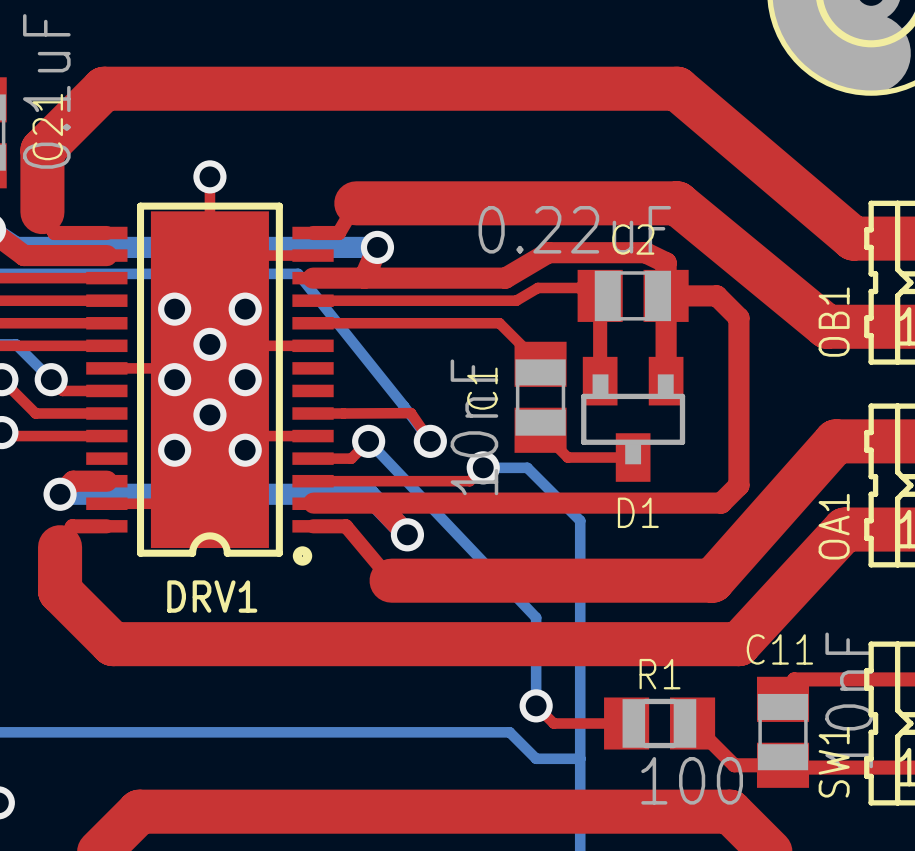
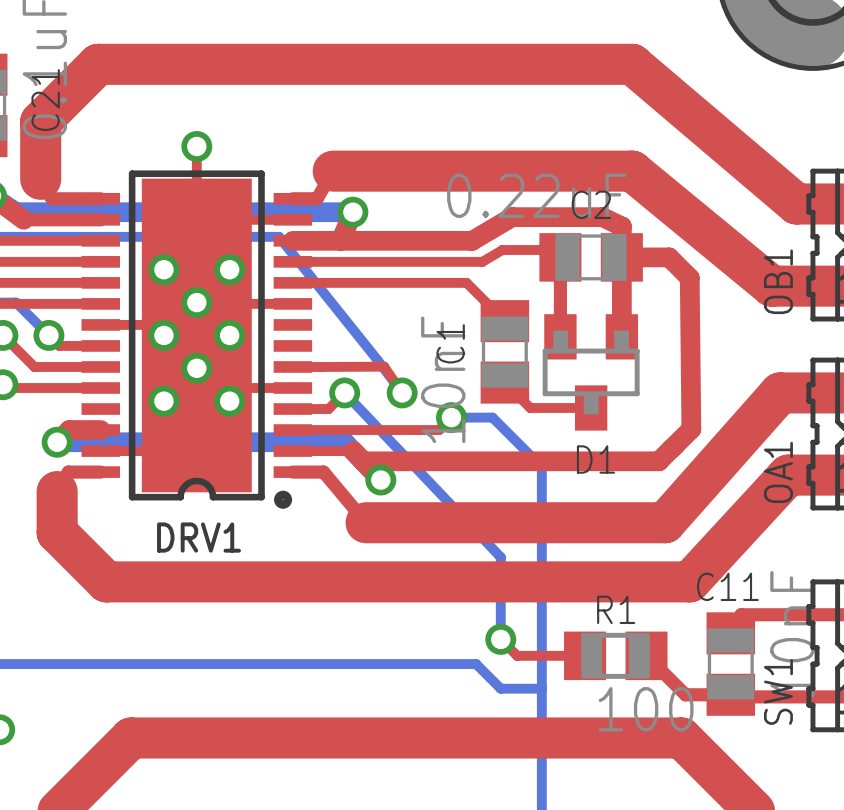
top track width: thick (24, 255) (106, 255) -> thin (23, 219) (100, 219)
top track: (738, 317) (738, 485) (721, 503) (313, 503) -> (689, 277) (691, 429) (658, 461) (362, 461) (356, 455)

